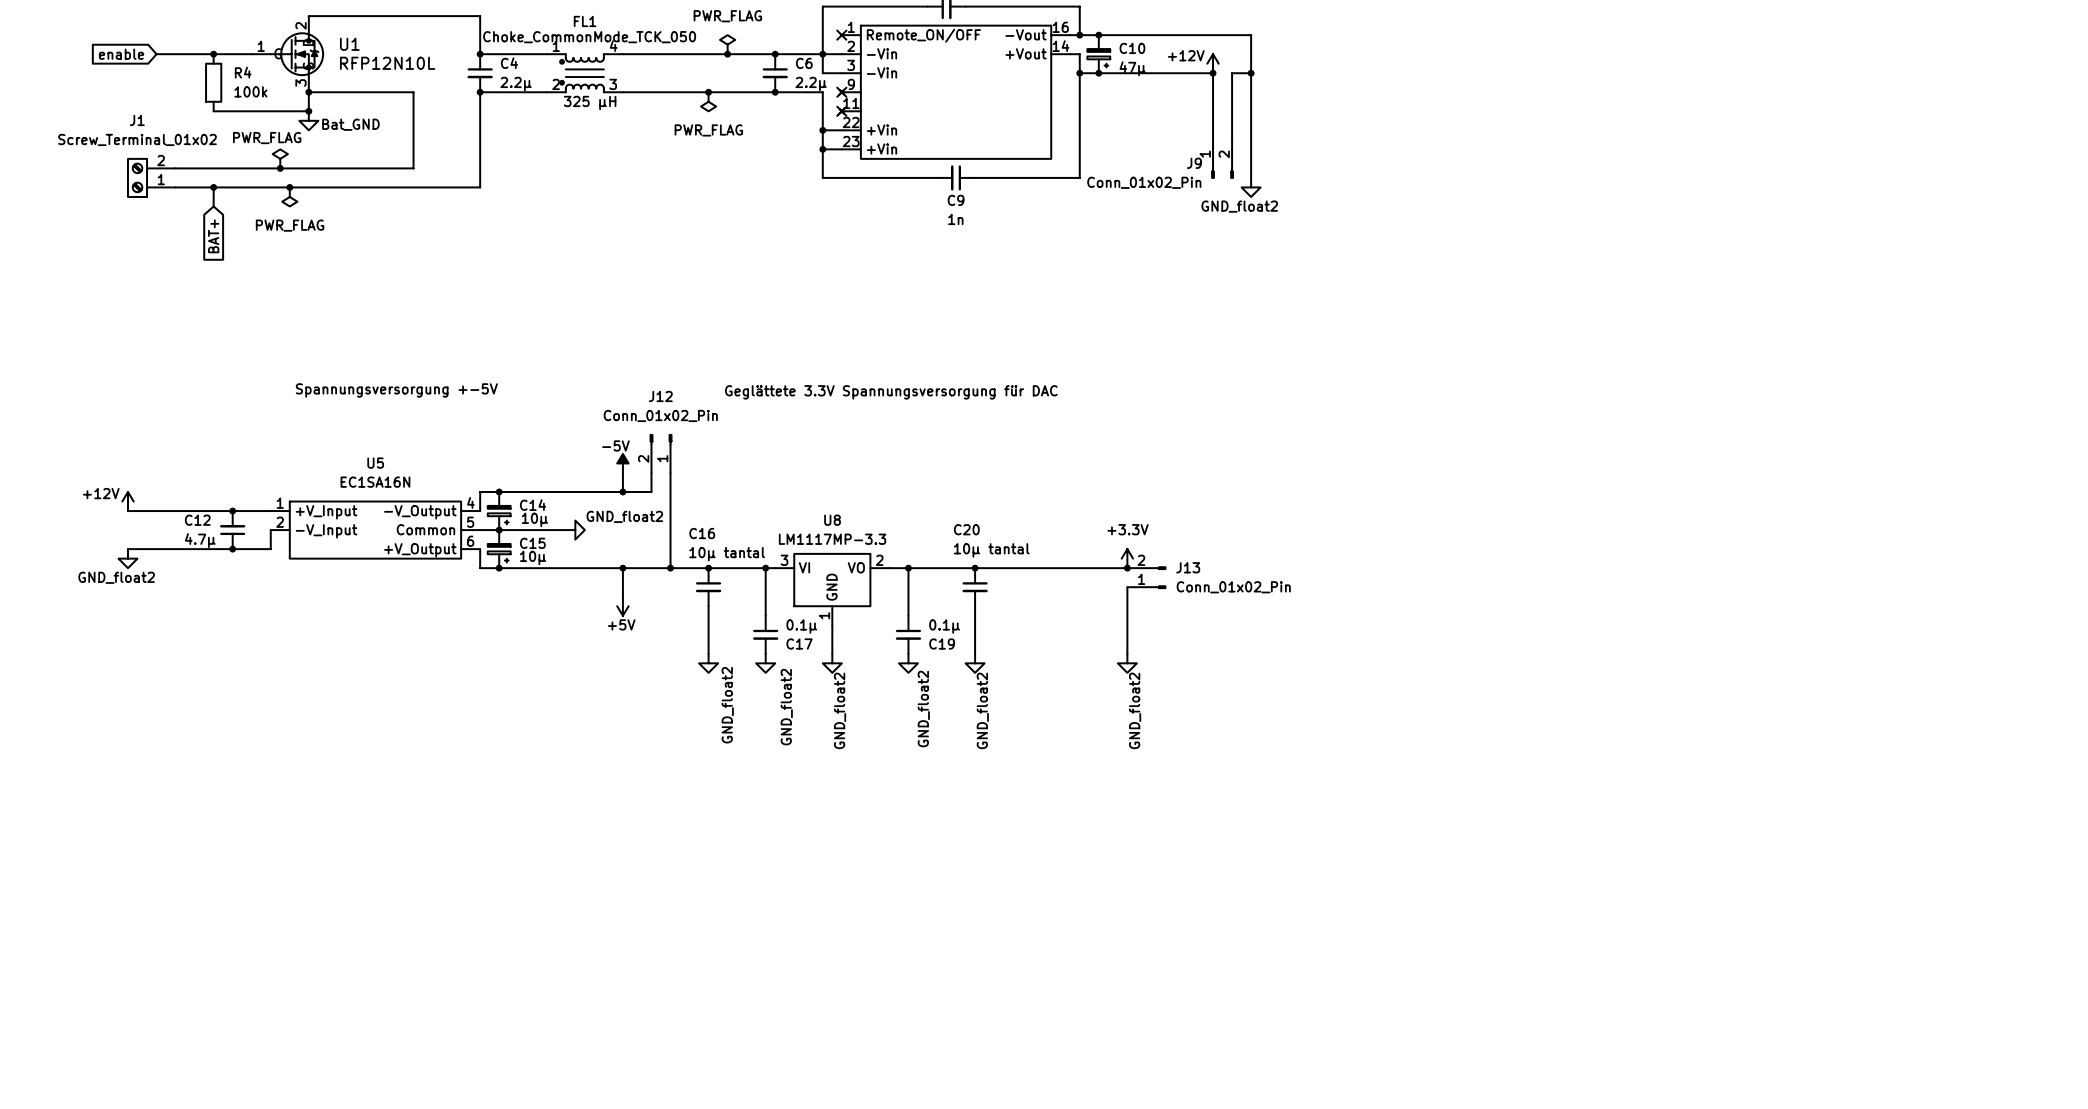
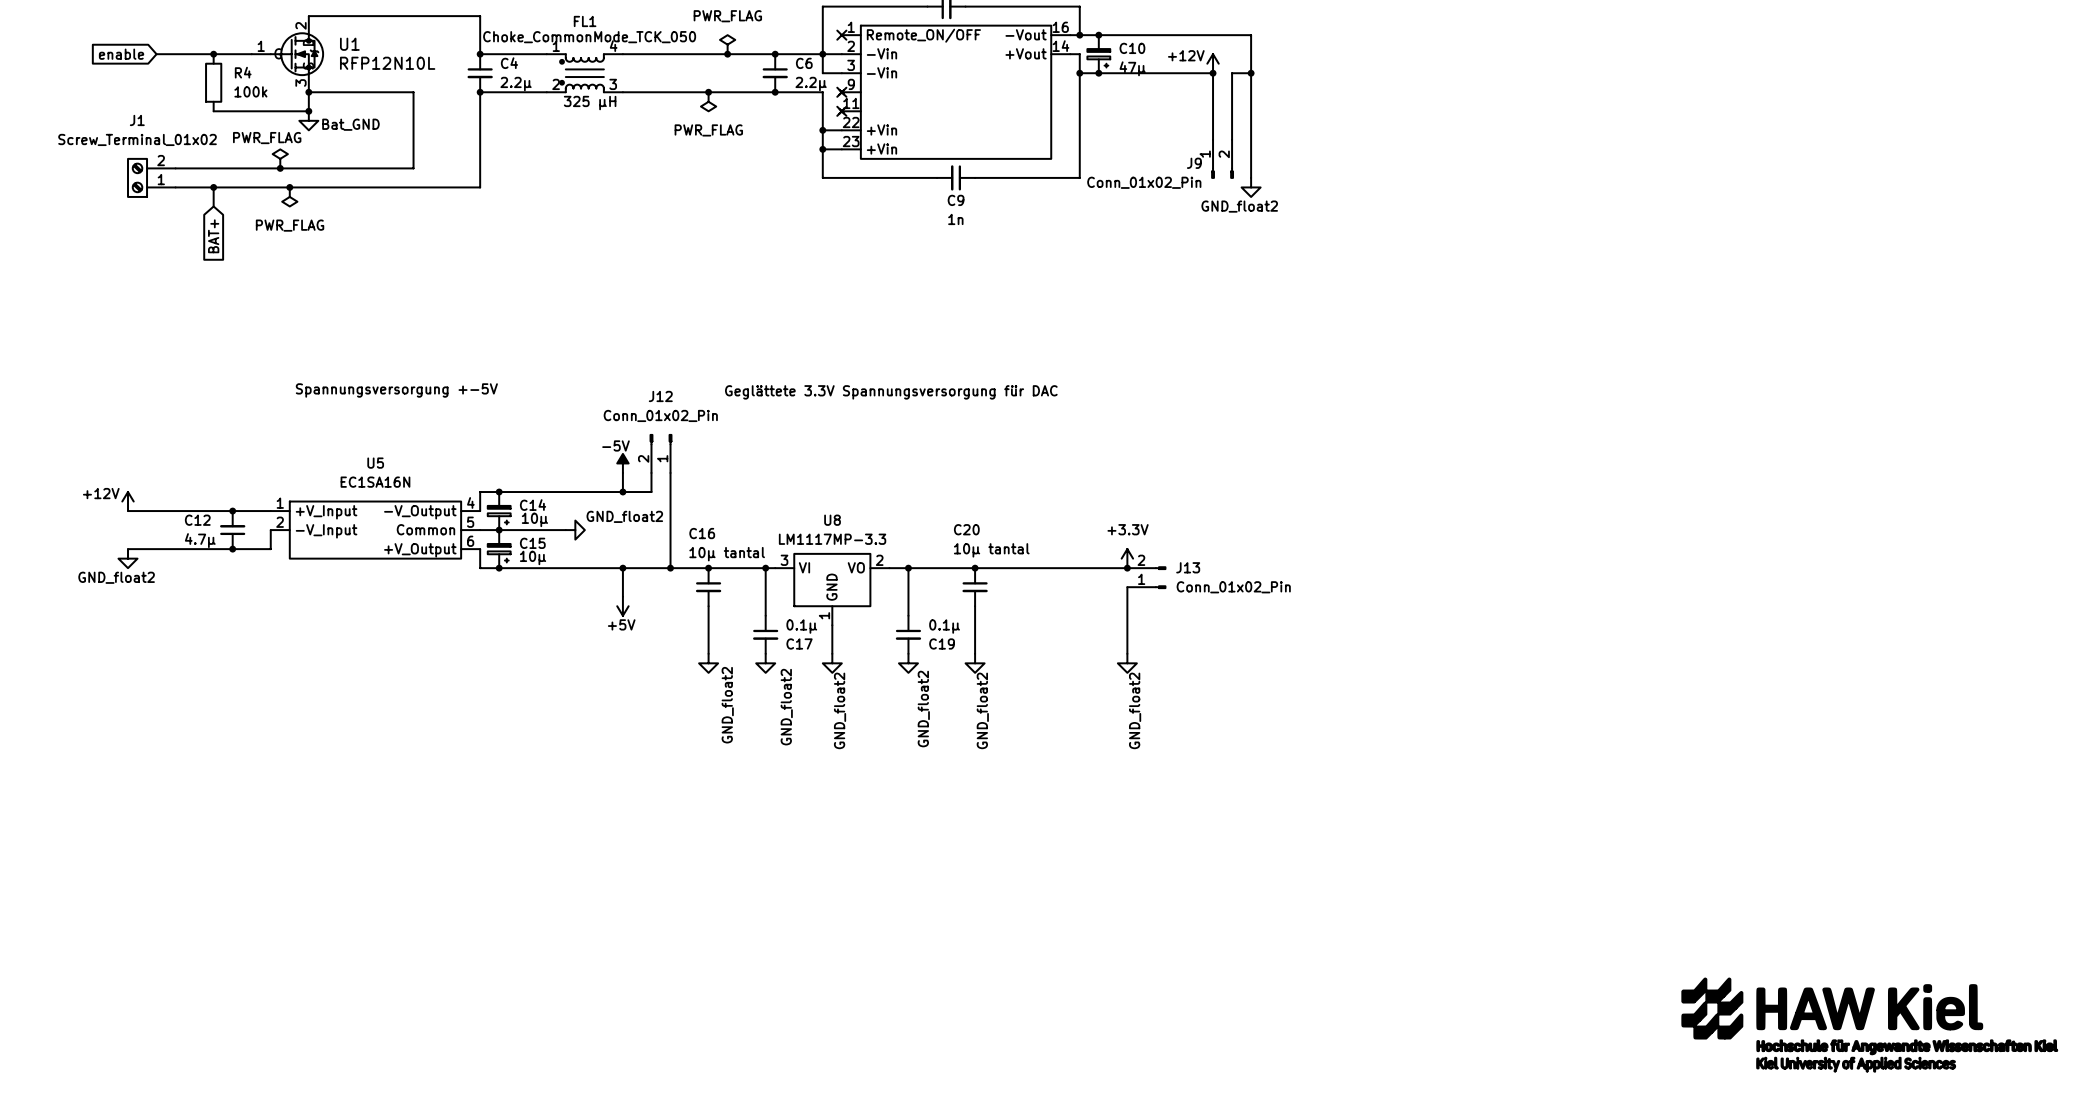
power symbol: none -> (1869, 1025)

